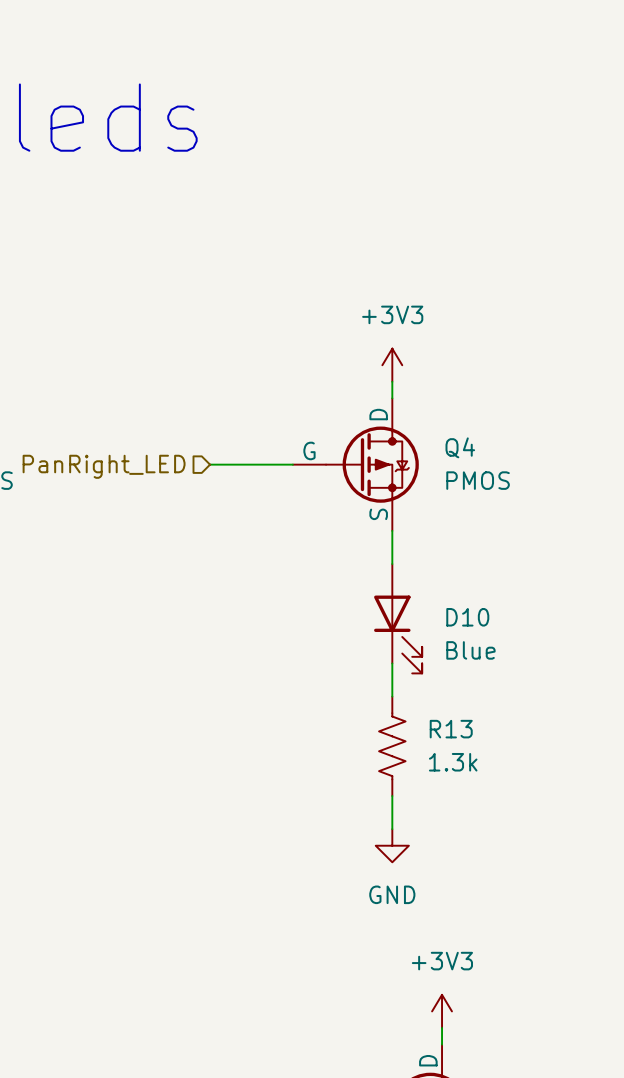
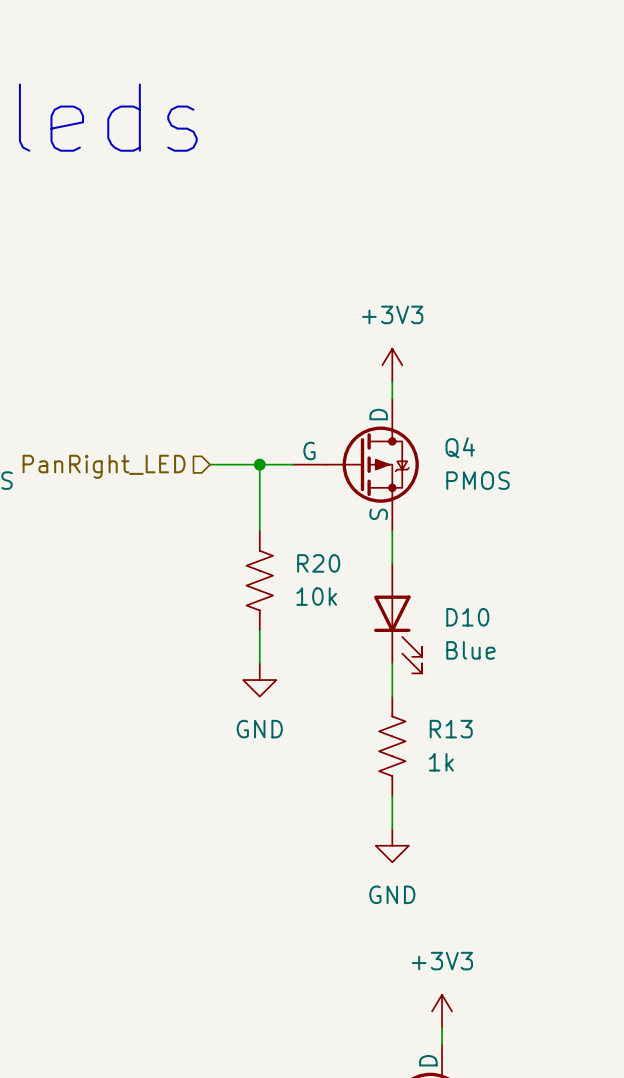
wire: none -> (259, 464) (259, 530)
junction: none -> (259, 464)
R20: none -> 10k (259, 580)
wire: none -> (259, 630) (259, 663)
power symbol: none -> GND (259, 680)
R13 value: 1.3k (453, 762) -> 1k (441, 762)

